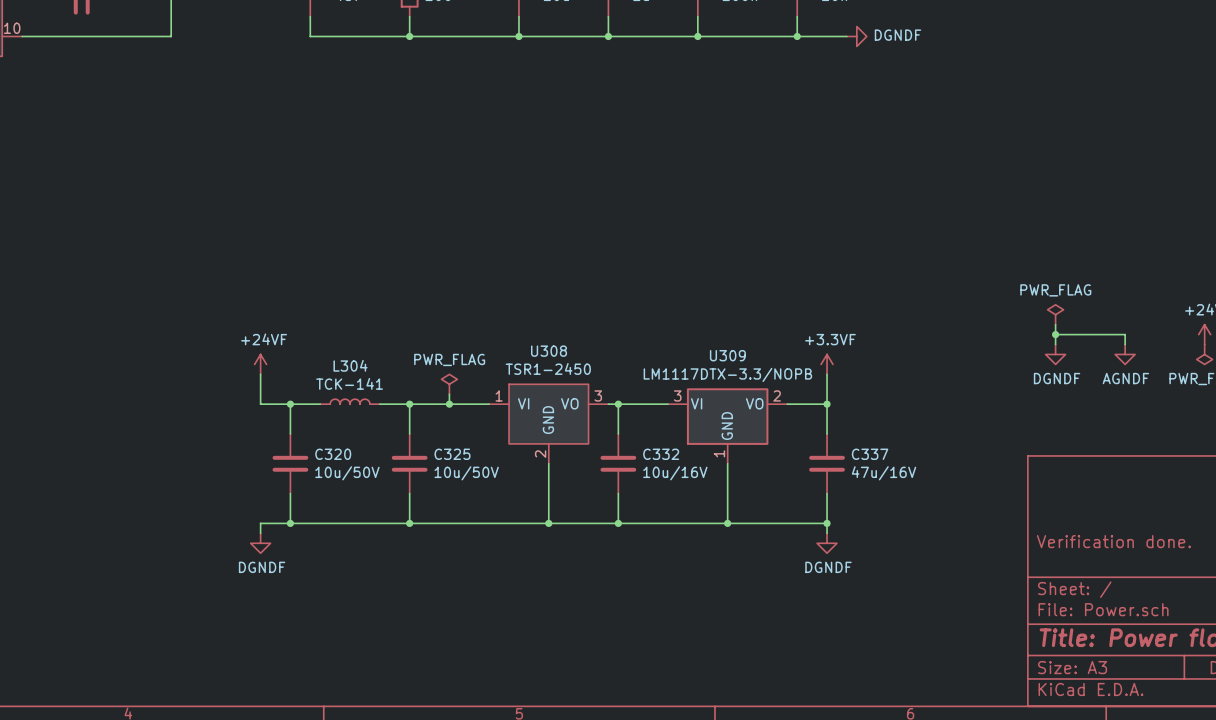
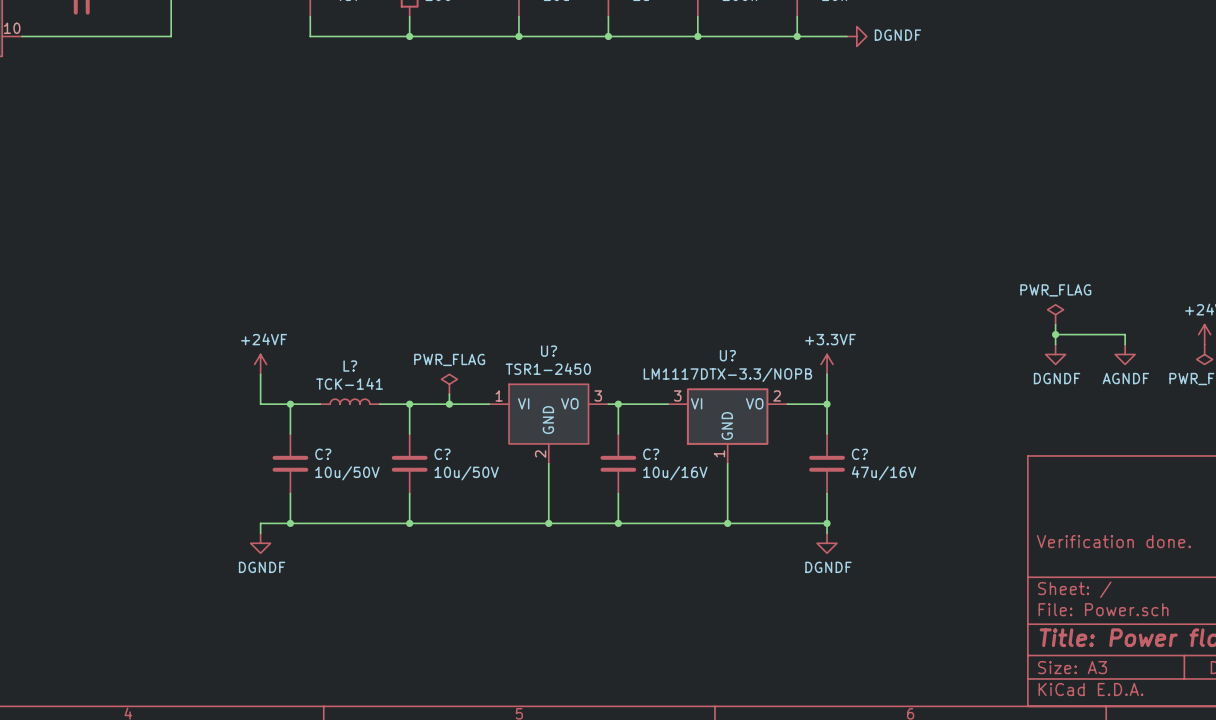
U308 name: U308 (549, 351) -> U? (549, 351)
U309 name: U309 (727, 355) -> U? (727, 355)
L304 name: L304 (350, 365) -> L? (350, 366)
C320 name: C320 (333, 454) -> C? (323, 454)
C325 name: C325 (452, 454) -> C? (442, 454)
C332 name: C332 (661, 454) -> C? (651, 454)
C337 name: C337 (870, 454) -> C? (859, 454)

